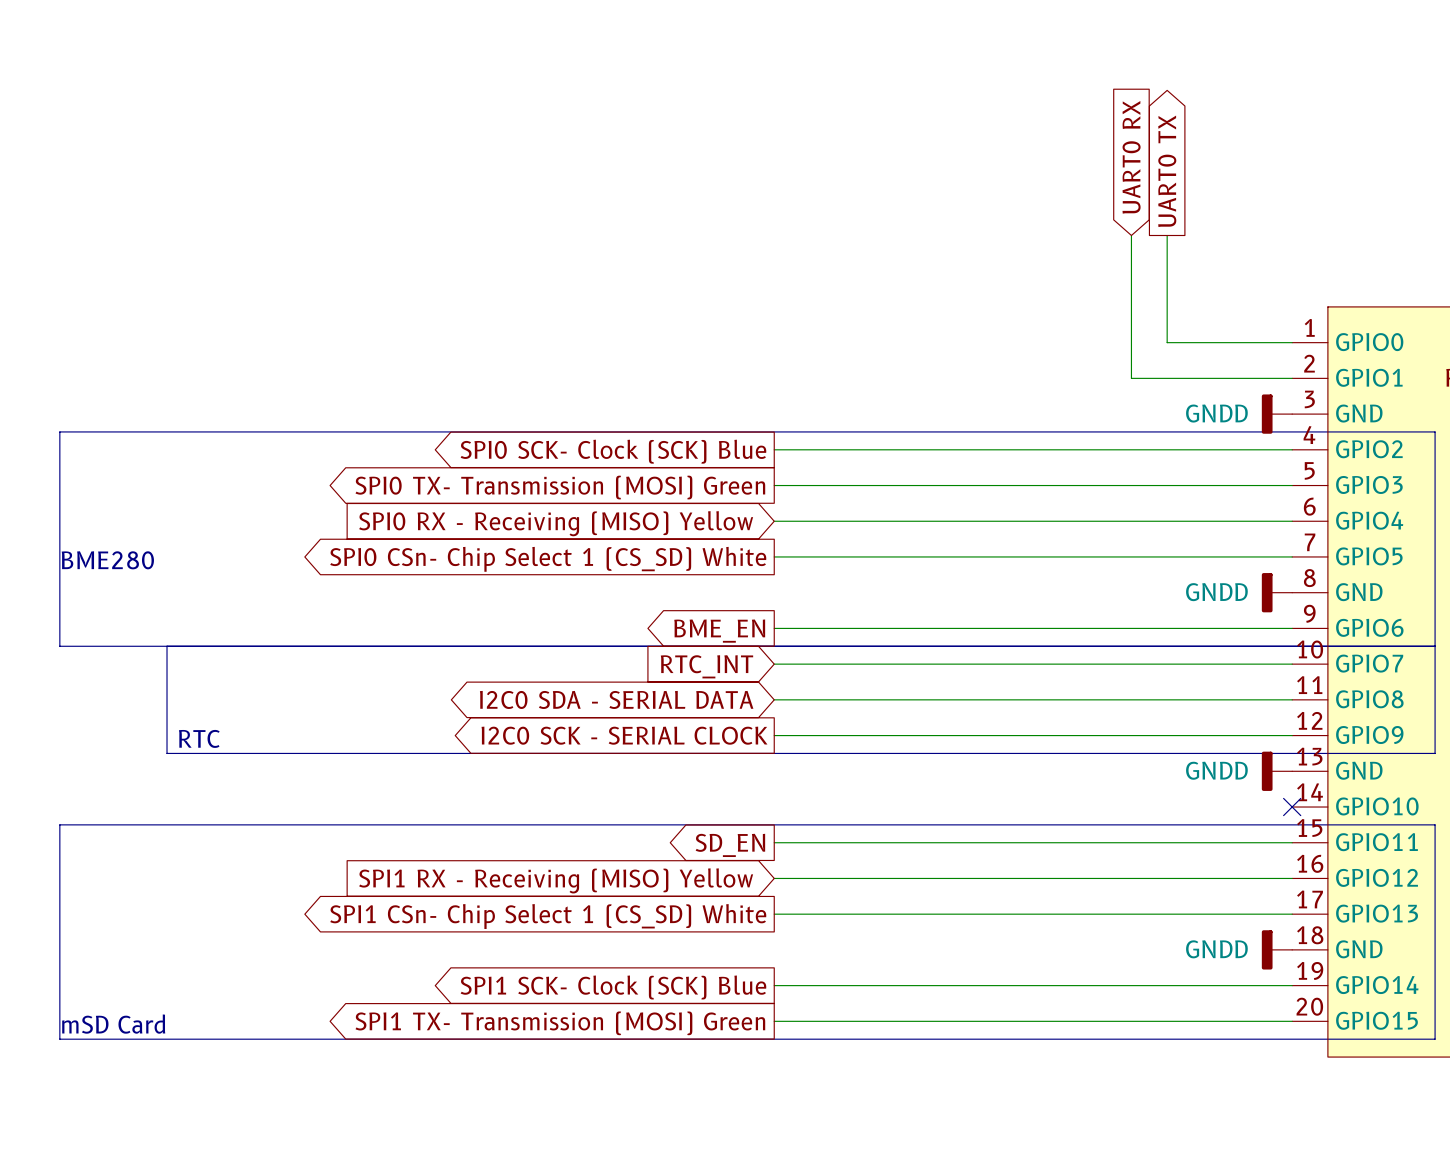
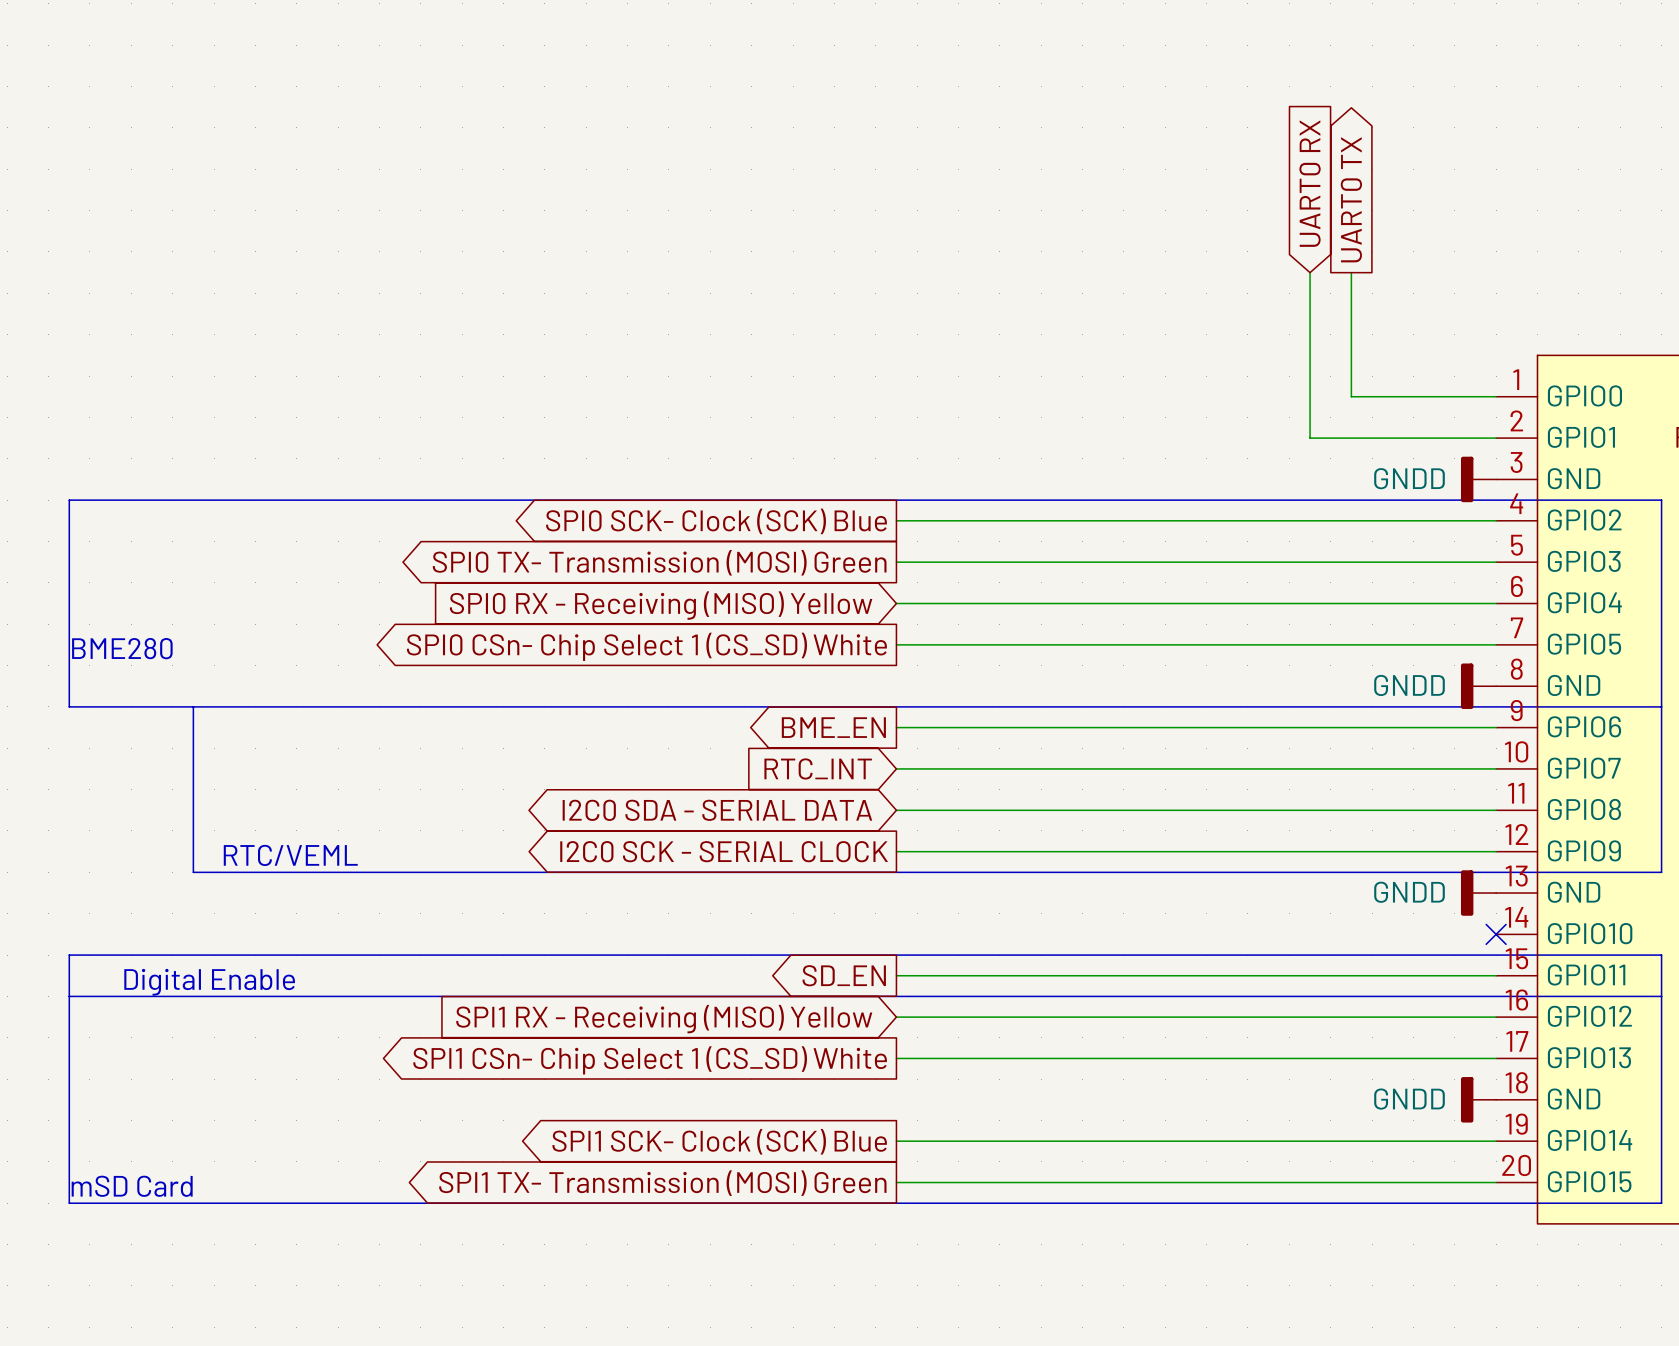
line: (59, 610) (59, 646) (1435, 646) -> (69, 706) (1661, 706)
line: none -> (193, 706) (193, 748)
text: RTC (199, 738) -> none
text: none -> RTC/VEML (290, 855)
text: none -> Digital Enable (209, 982)
line: none -> (69, 996) (1661, 996)

